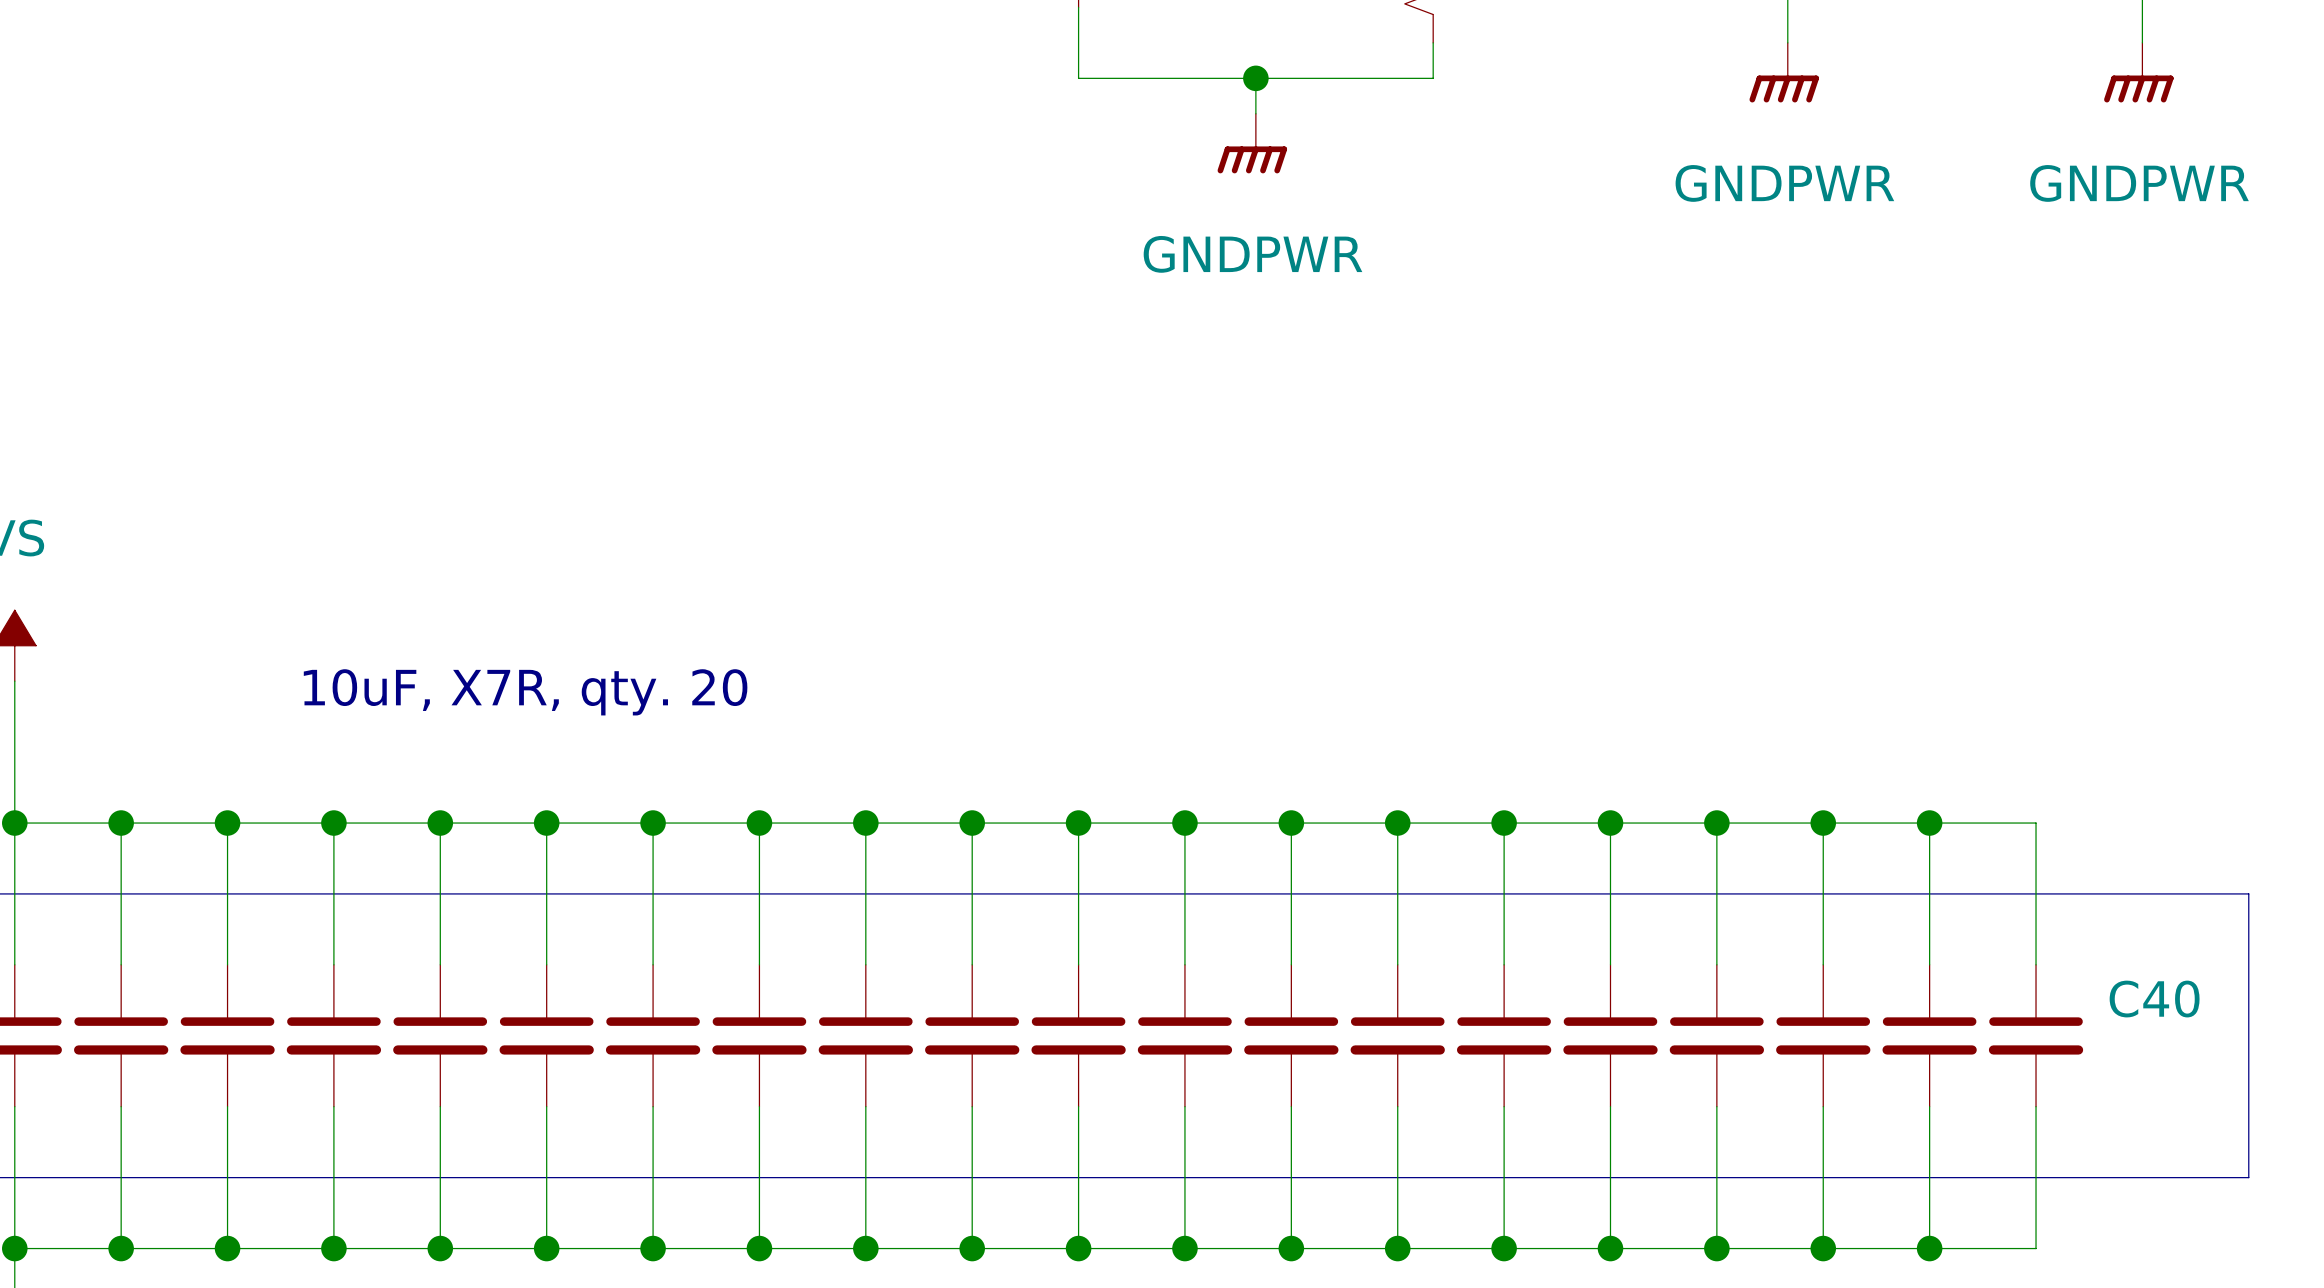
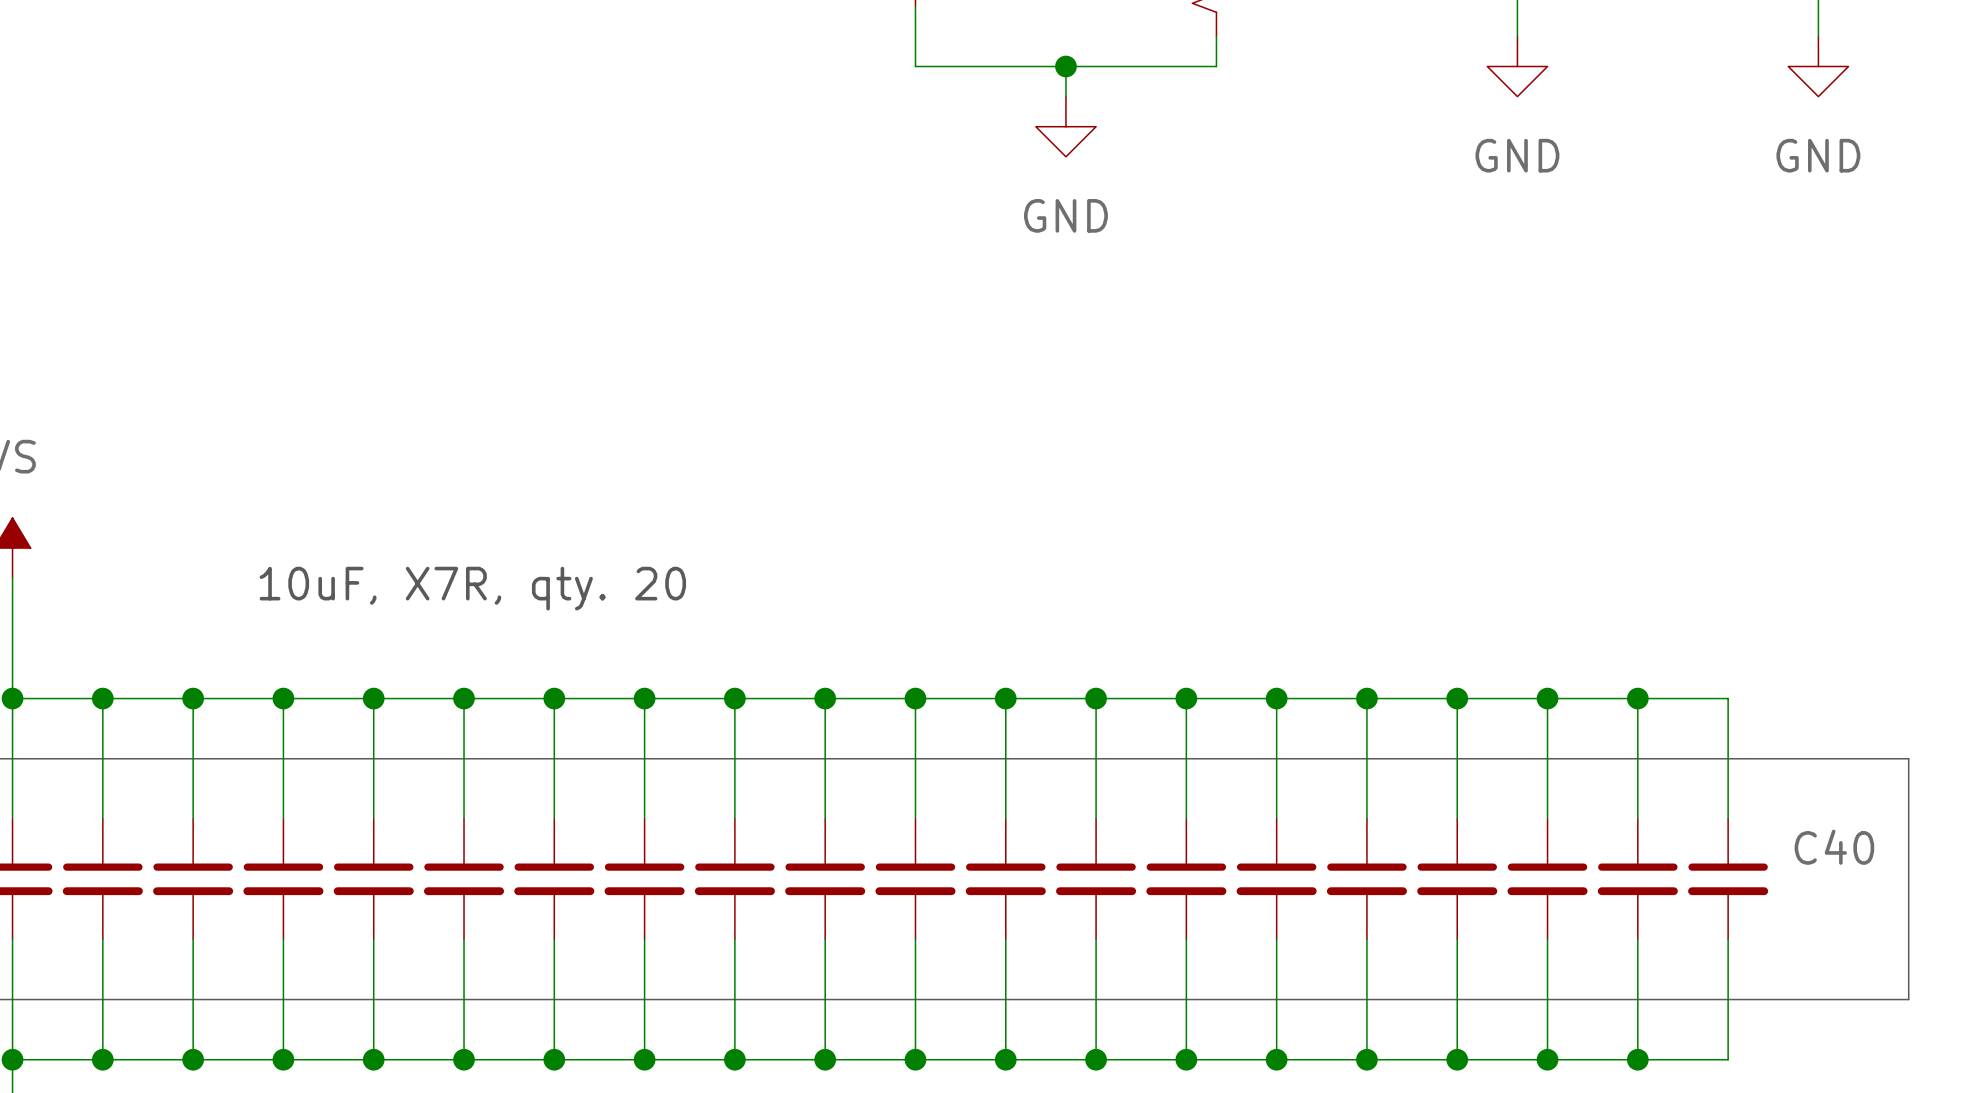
power symbol: GNDPWR (1784, 72) -> GND (1517, 66)
power symbol: GNDPWR (2138, 72) -> GND (1818, 66)
power symbol: GNDPWR (1252, 143) -> GND (1065, 126)

